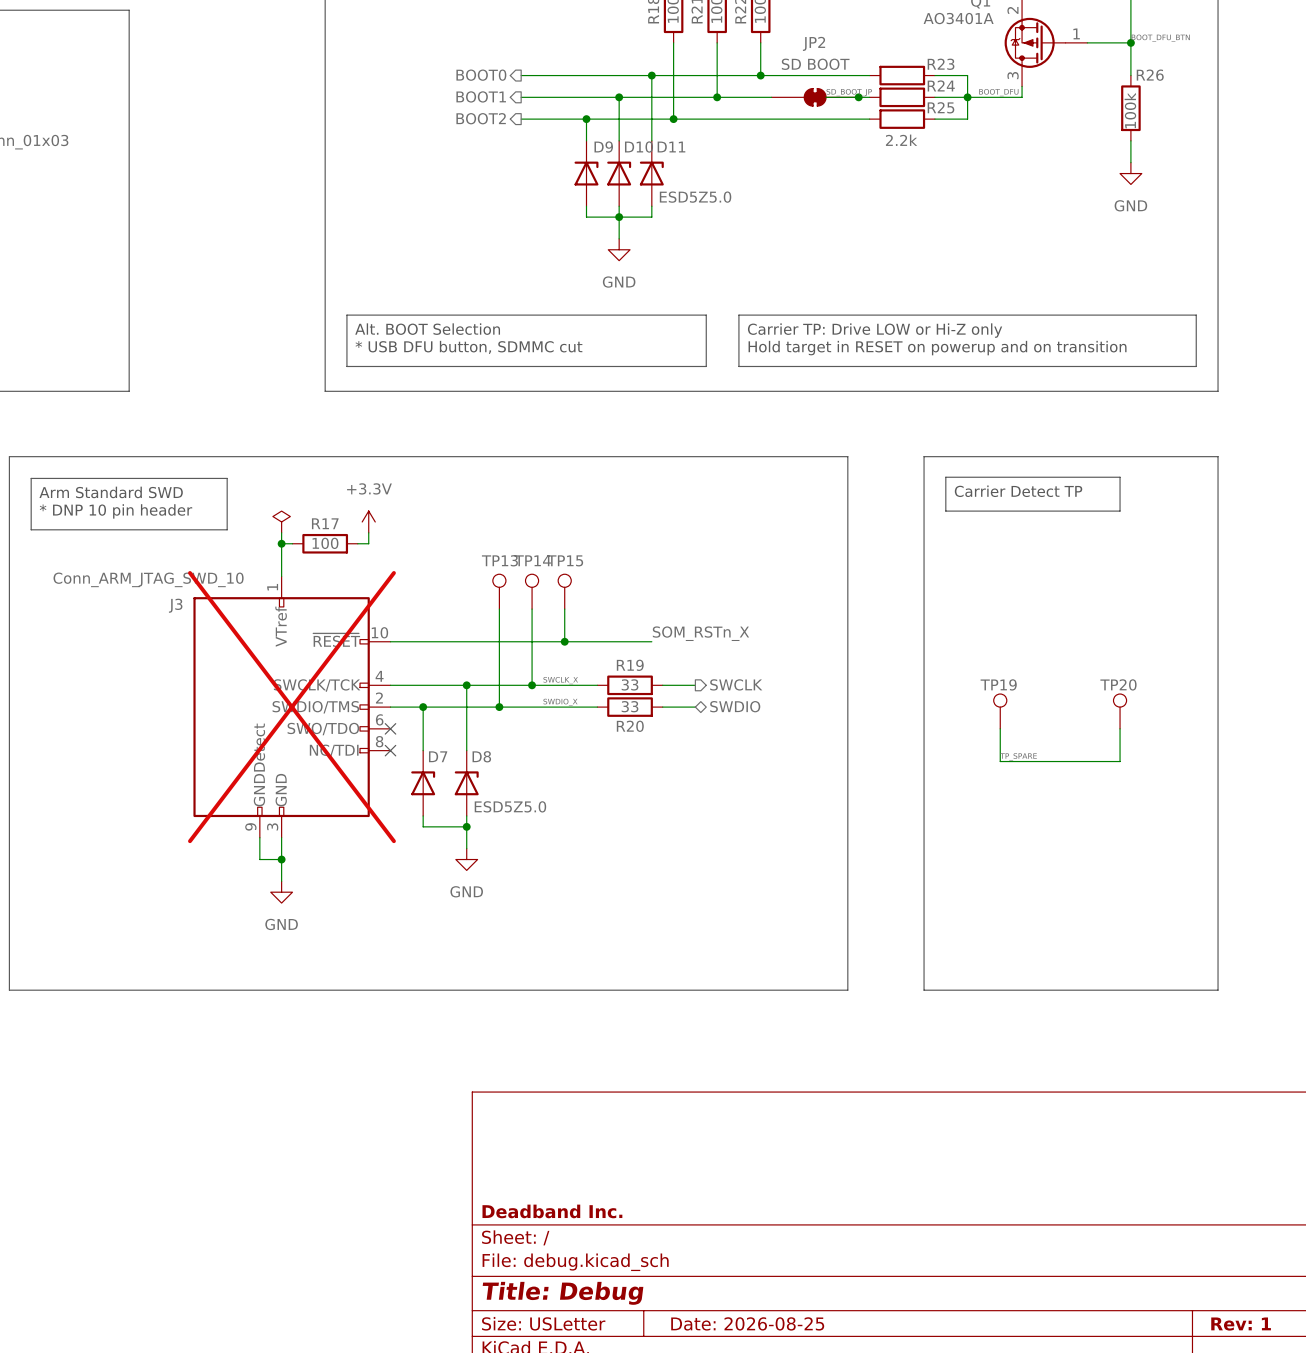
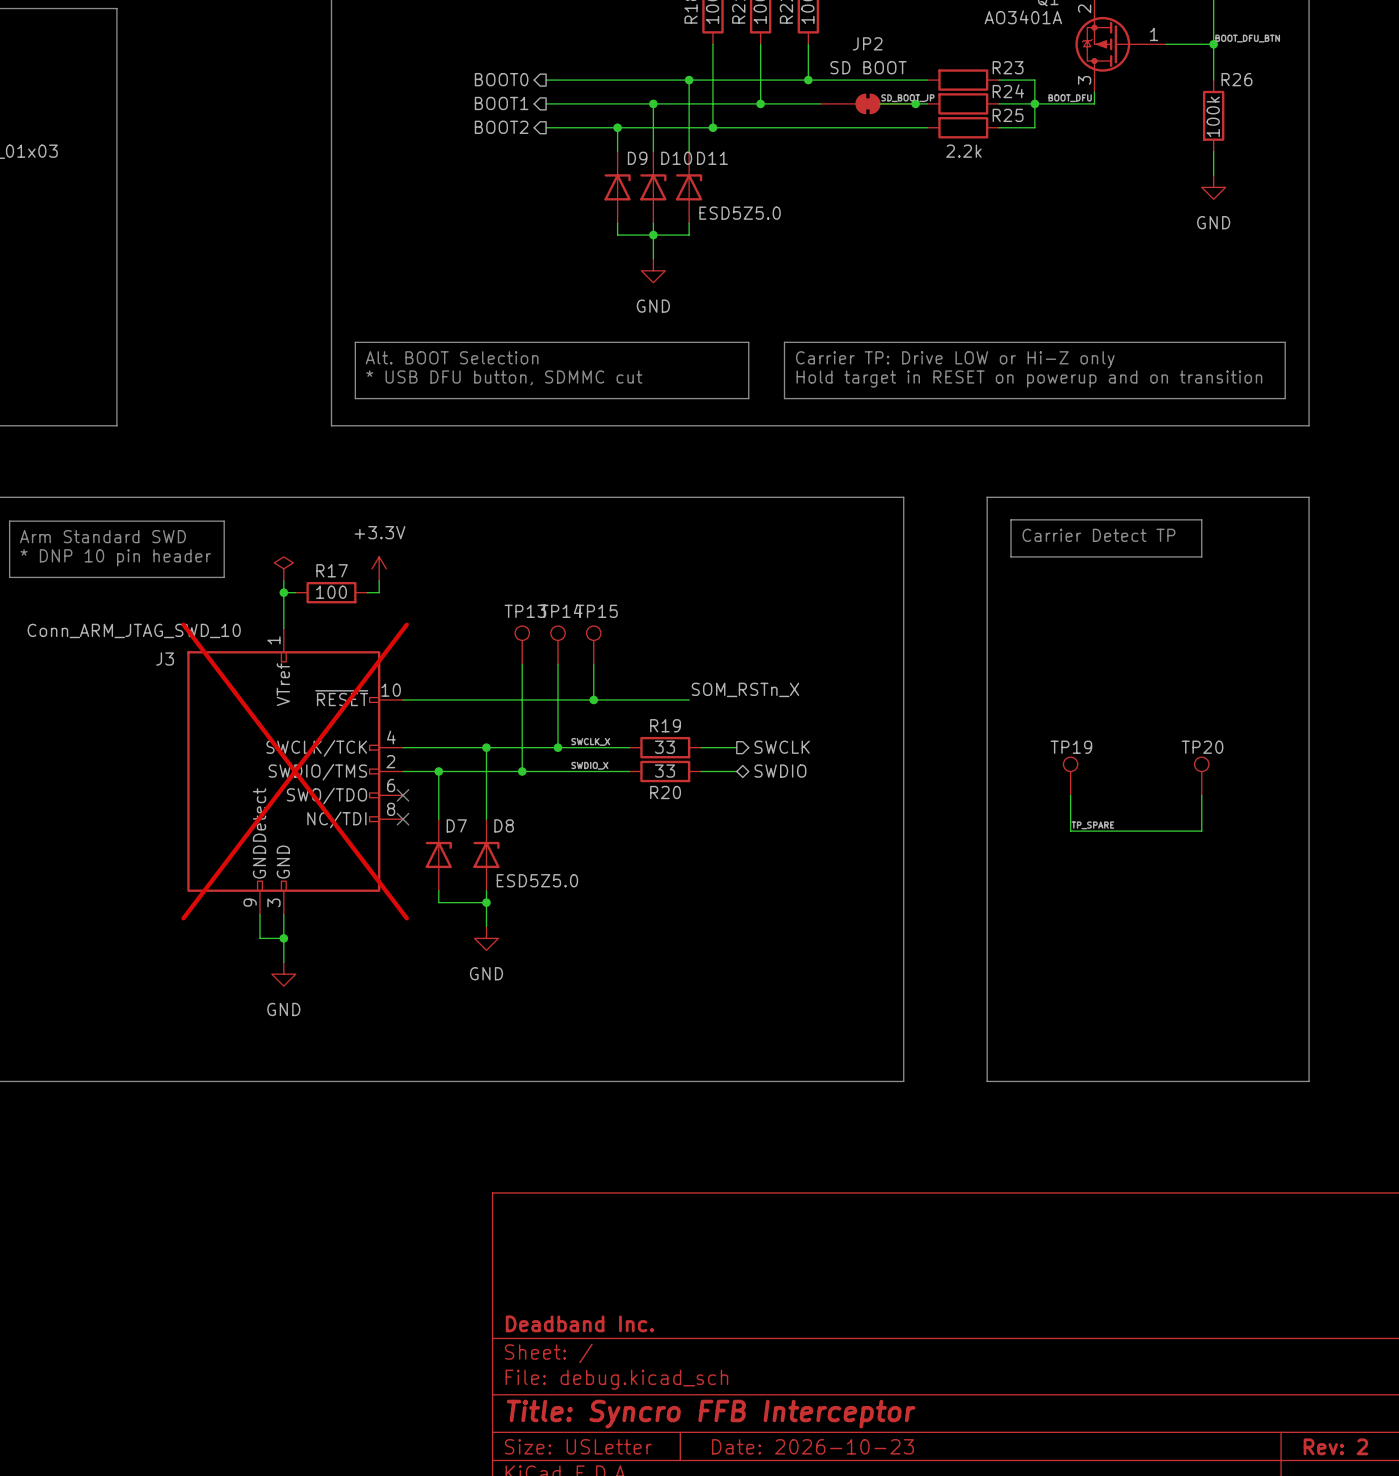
title block: Title: Debug (563, 1293) -> Title: Syncro FFB Interceptor (711, 1414)
title block: Date: 2026-08-25 (747, 1323) -> Date: 2026-10-23 (813, 1446)
title block: Rev: 1 (1241, 1324) -> Rev: 2 (1335, 1446)

